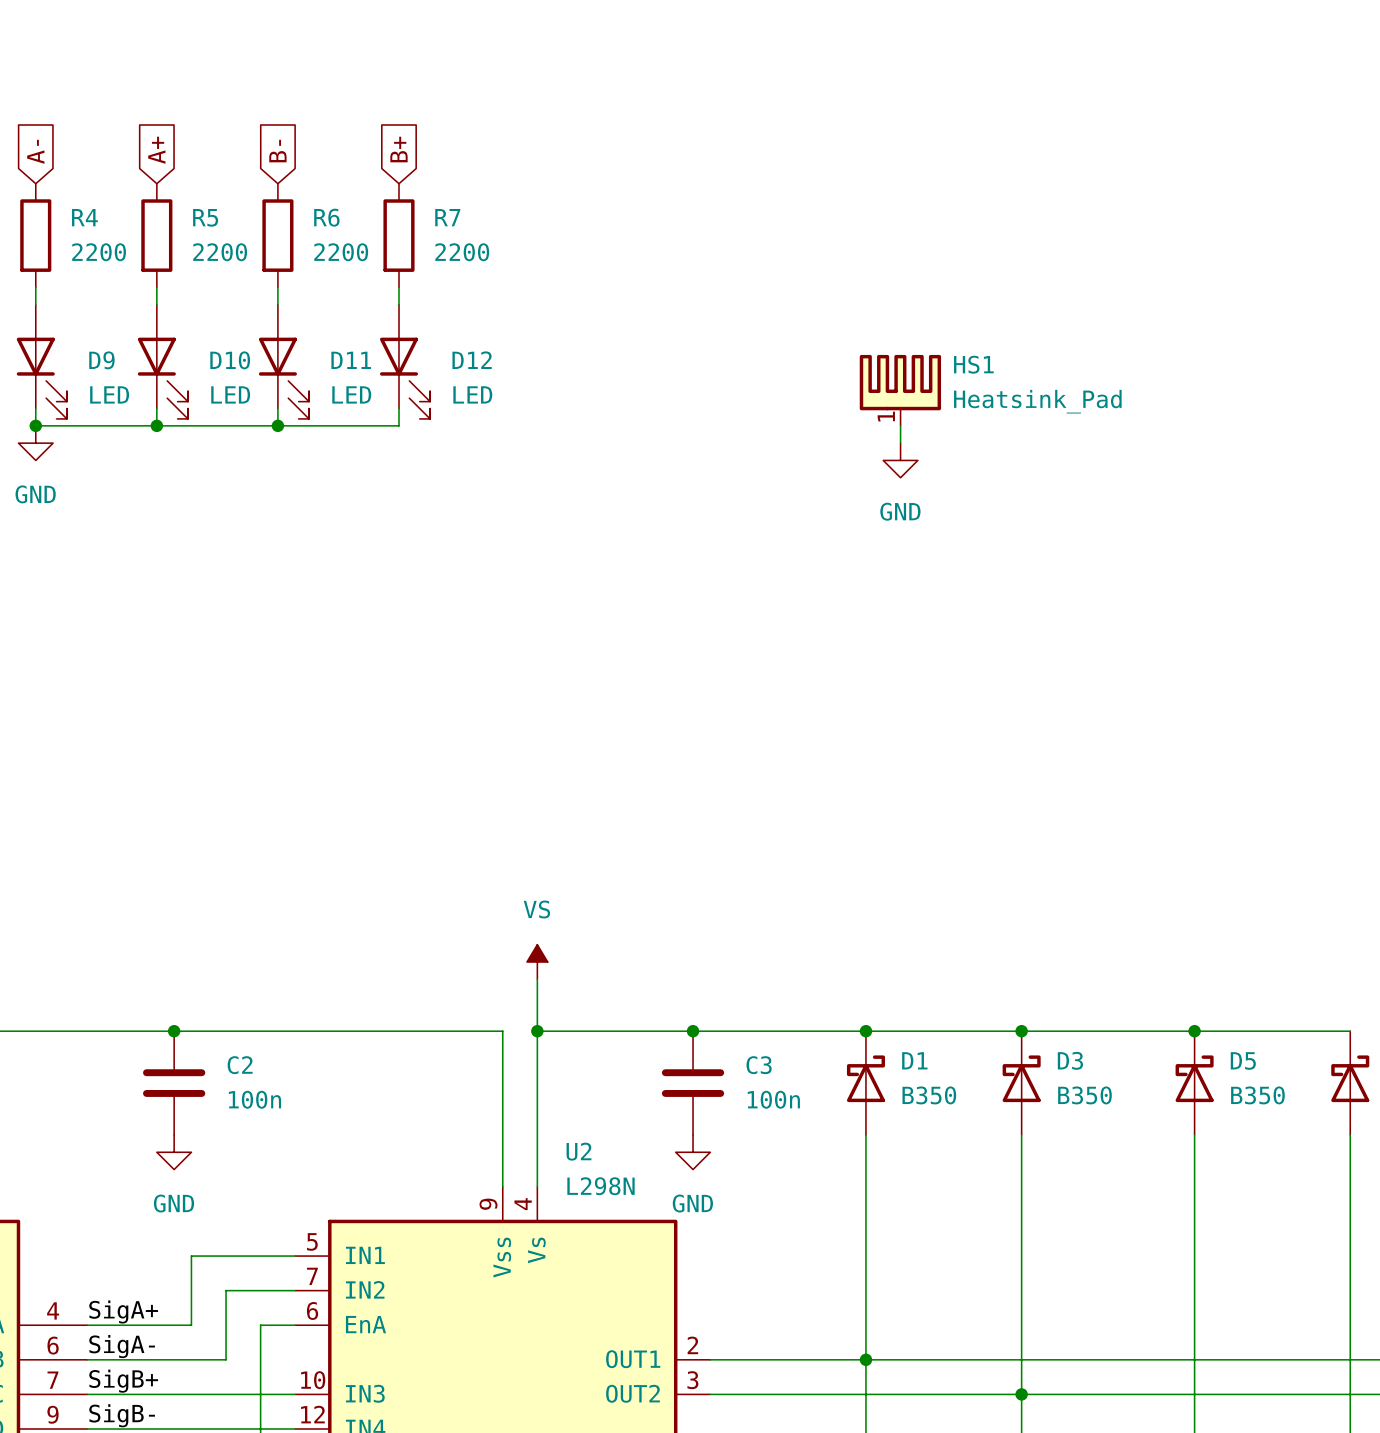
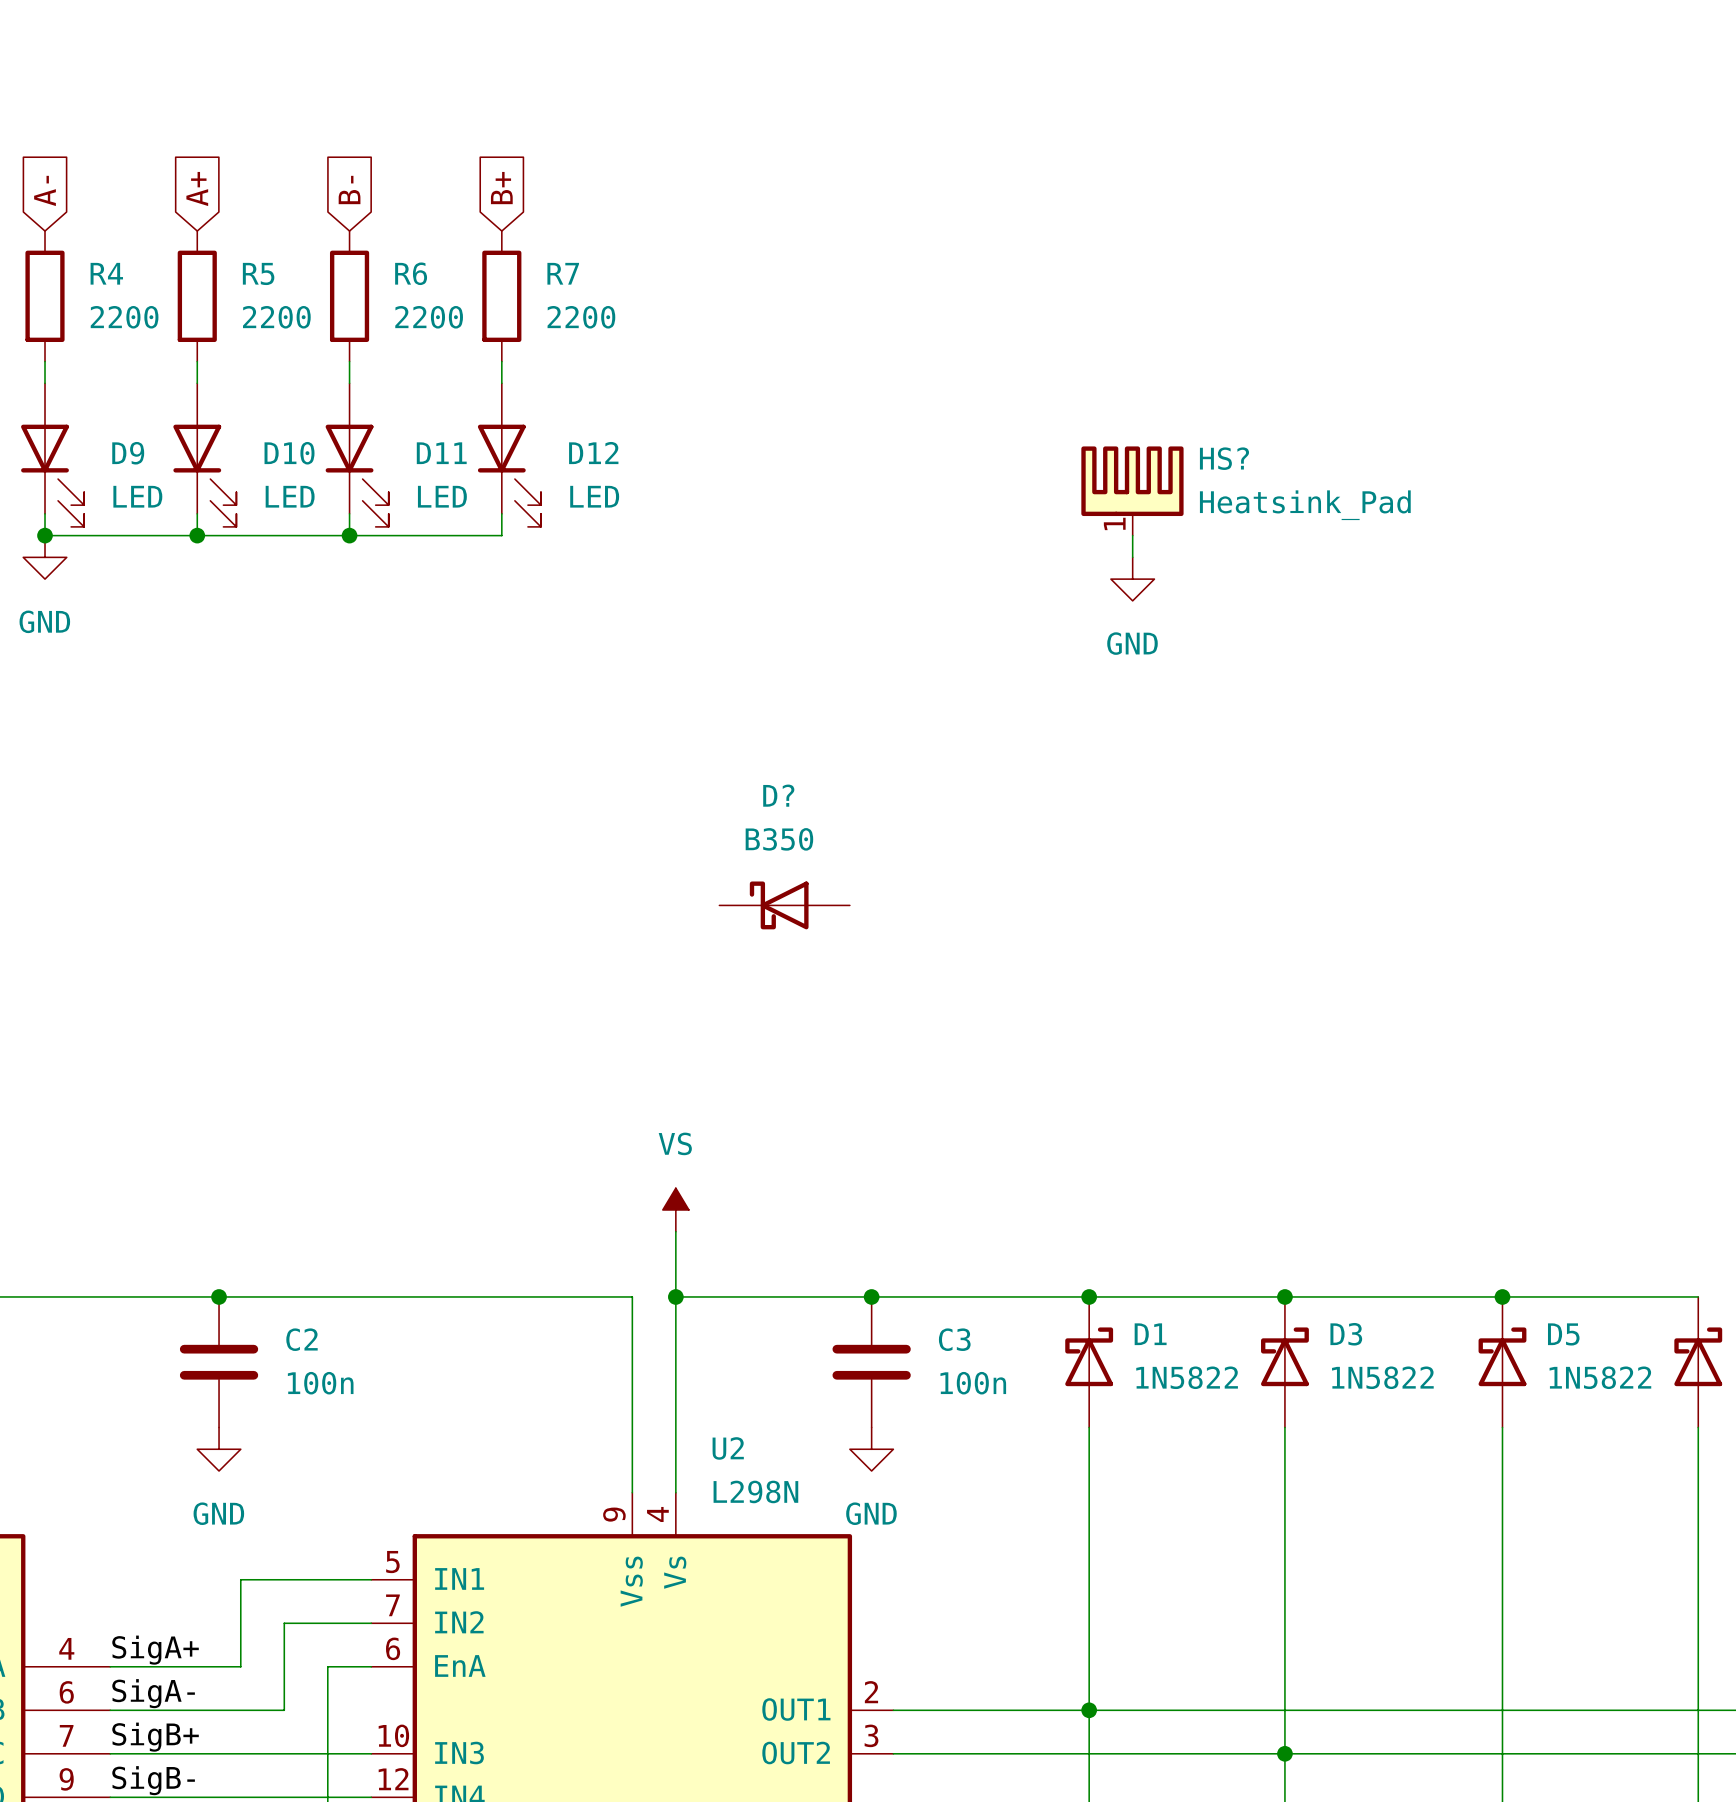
HS1 name: HS1 (973, 364) -> HS? (1224, 458)
D?: none -> B350 (784, 905)
D1 value: B350 (929, 1095) -> 1N5822 (1187, 1377)
D3 value: B350 (1084, 1095) -> 1N5822 (1382, 1377)
D5 value: B350 (1257, 1095) -> 1N5822 (1600, 1377)

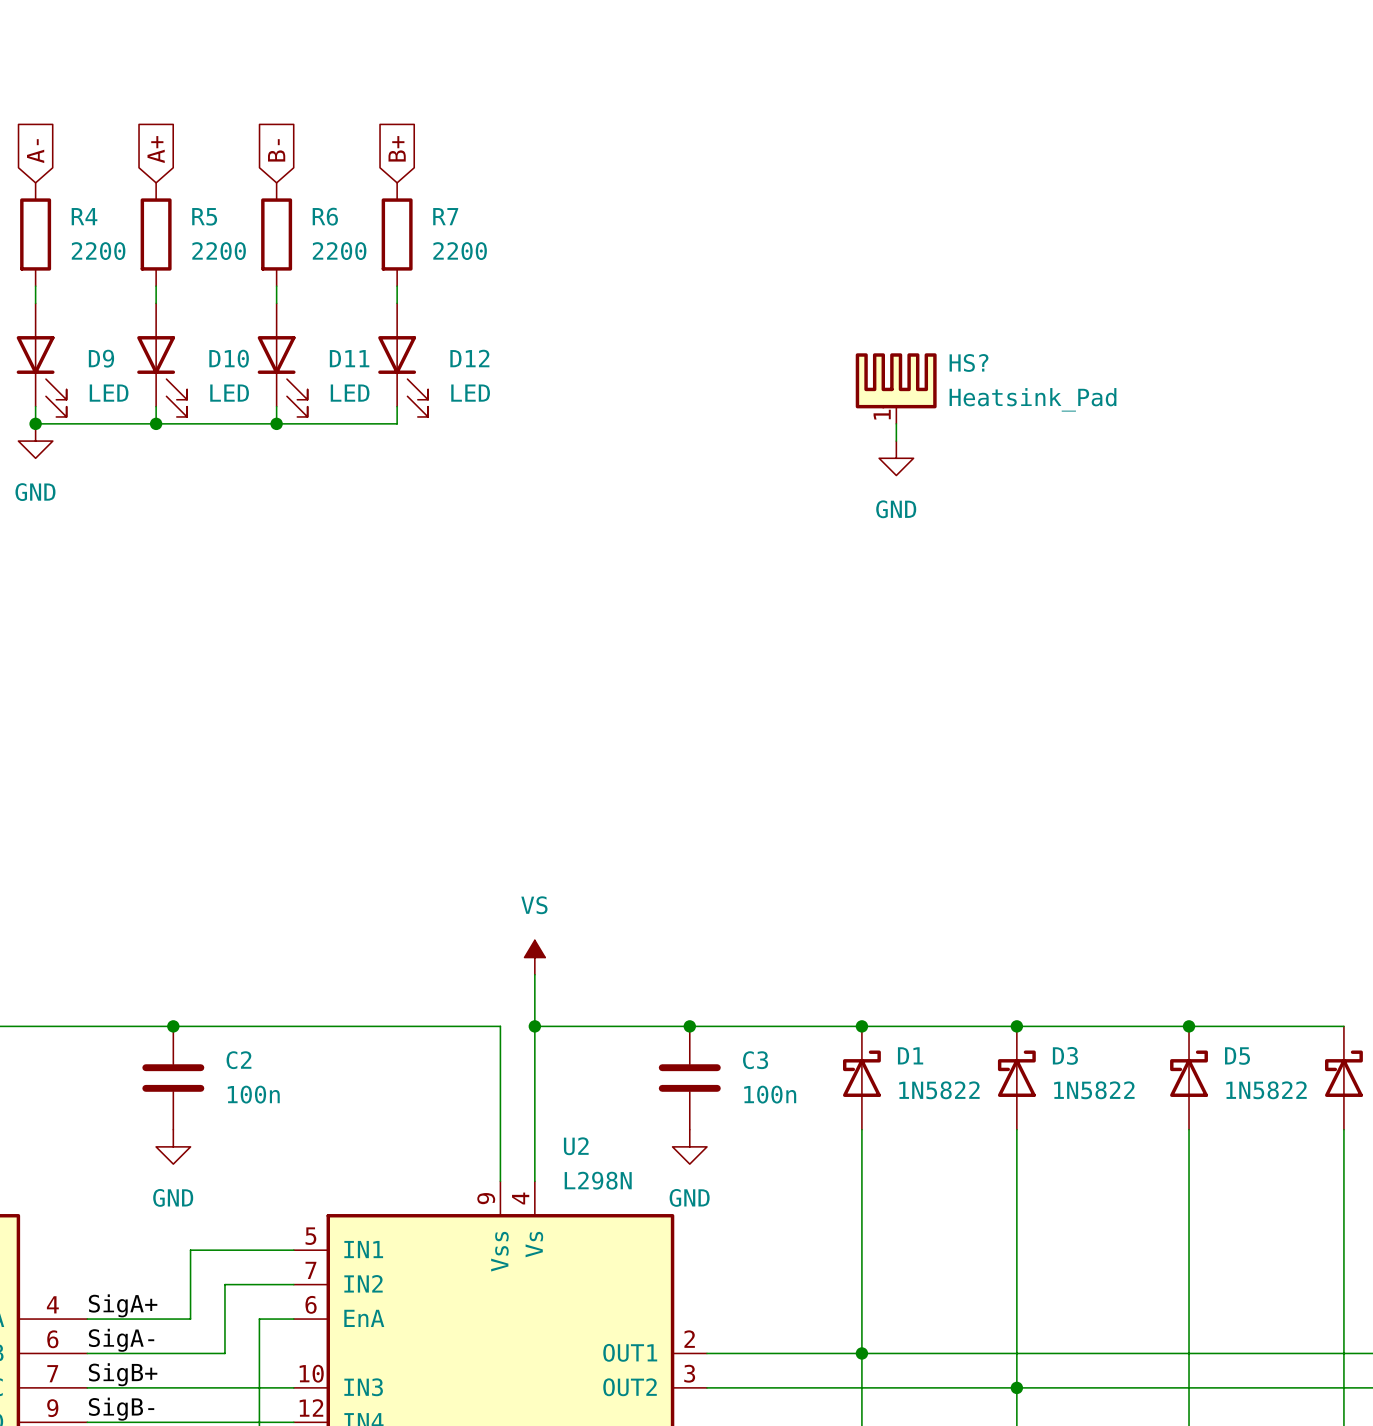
D?: B350 (784, 905) -> none

